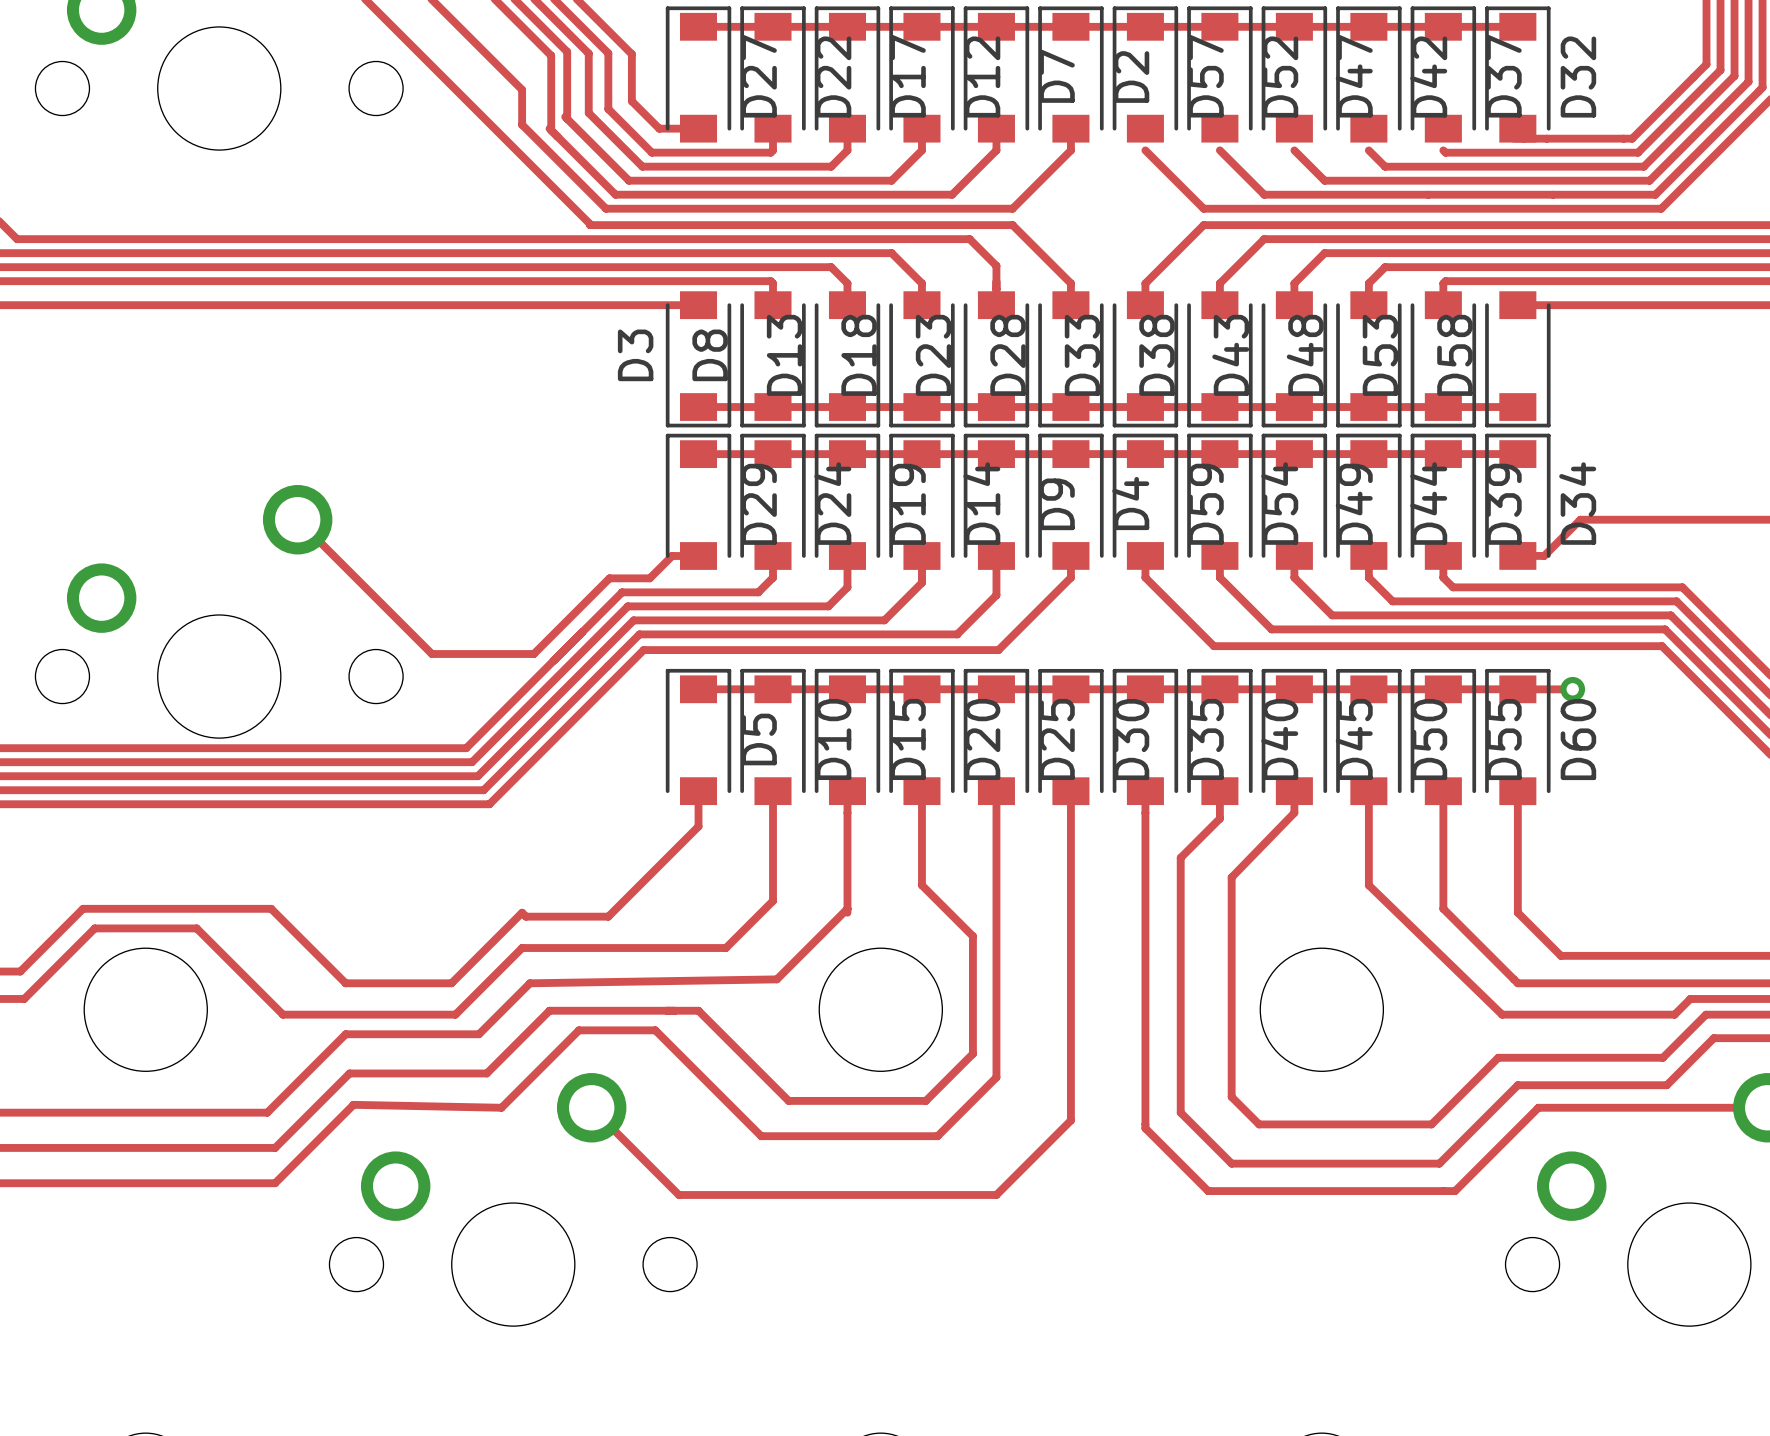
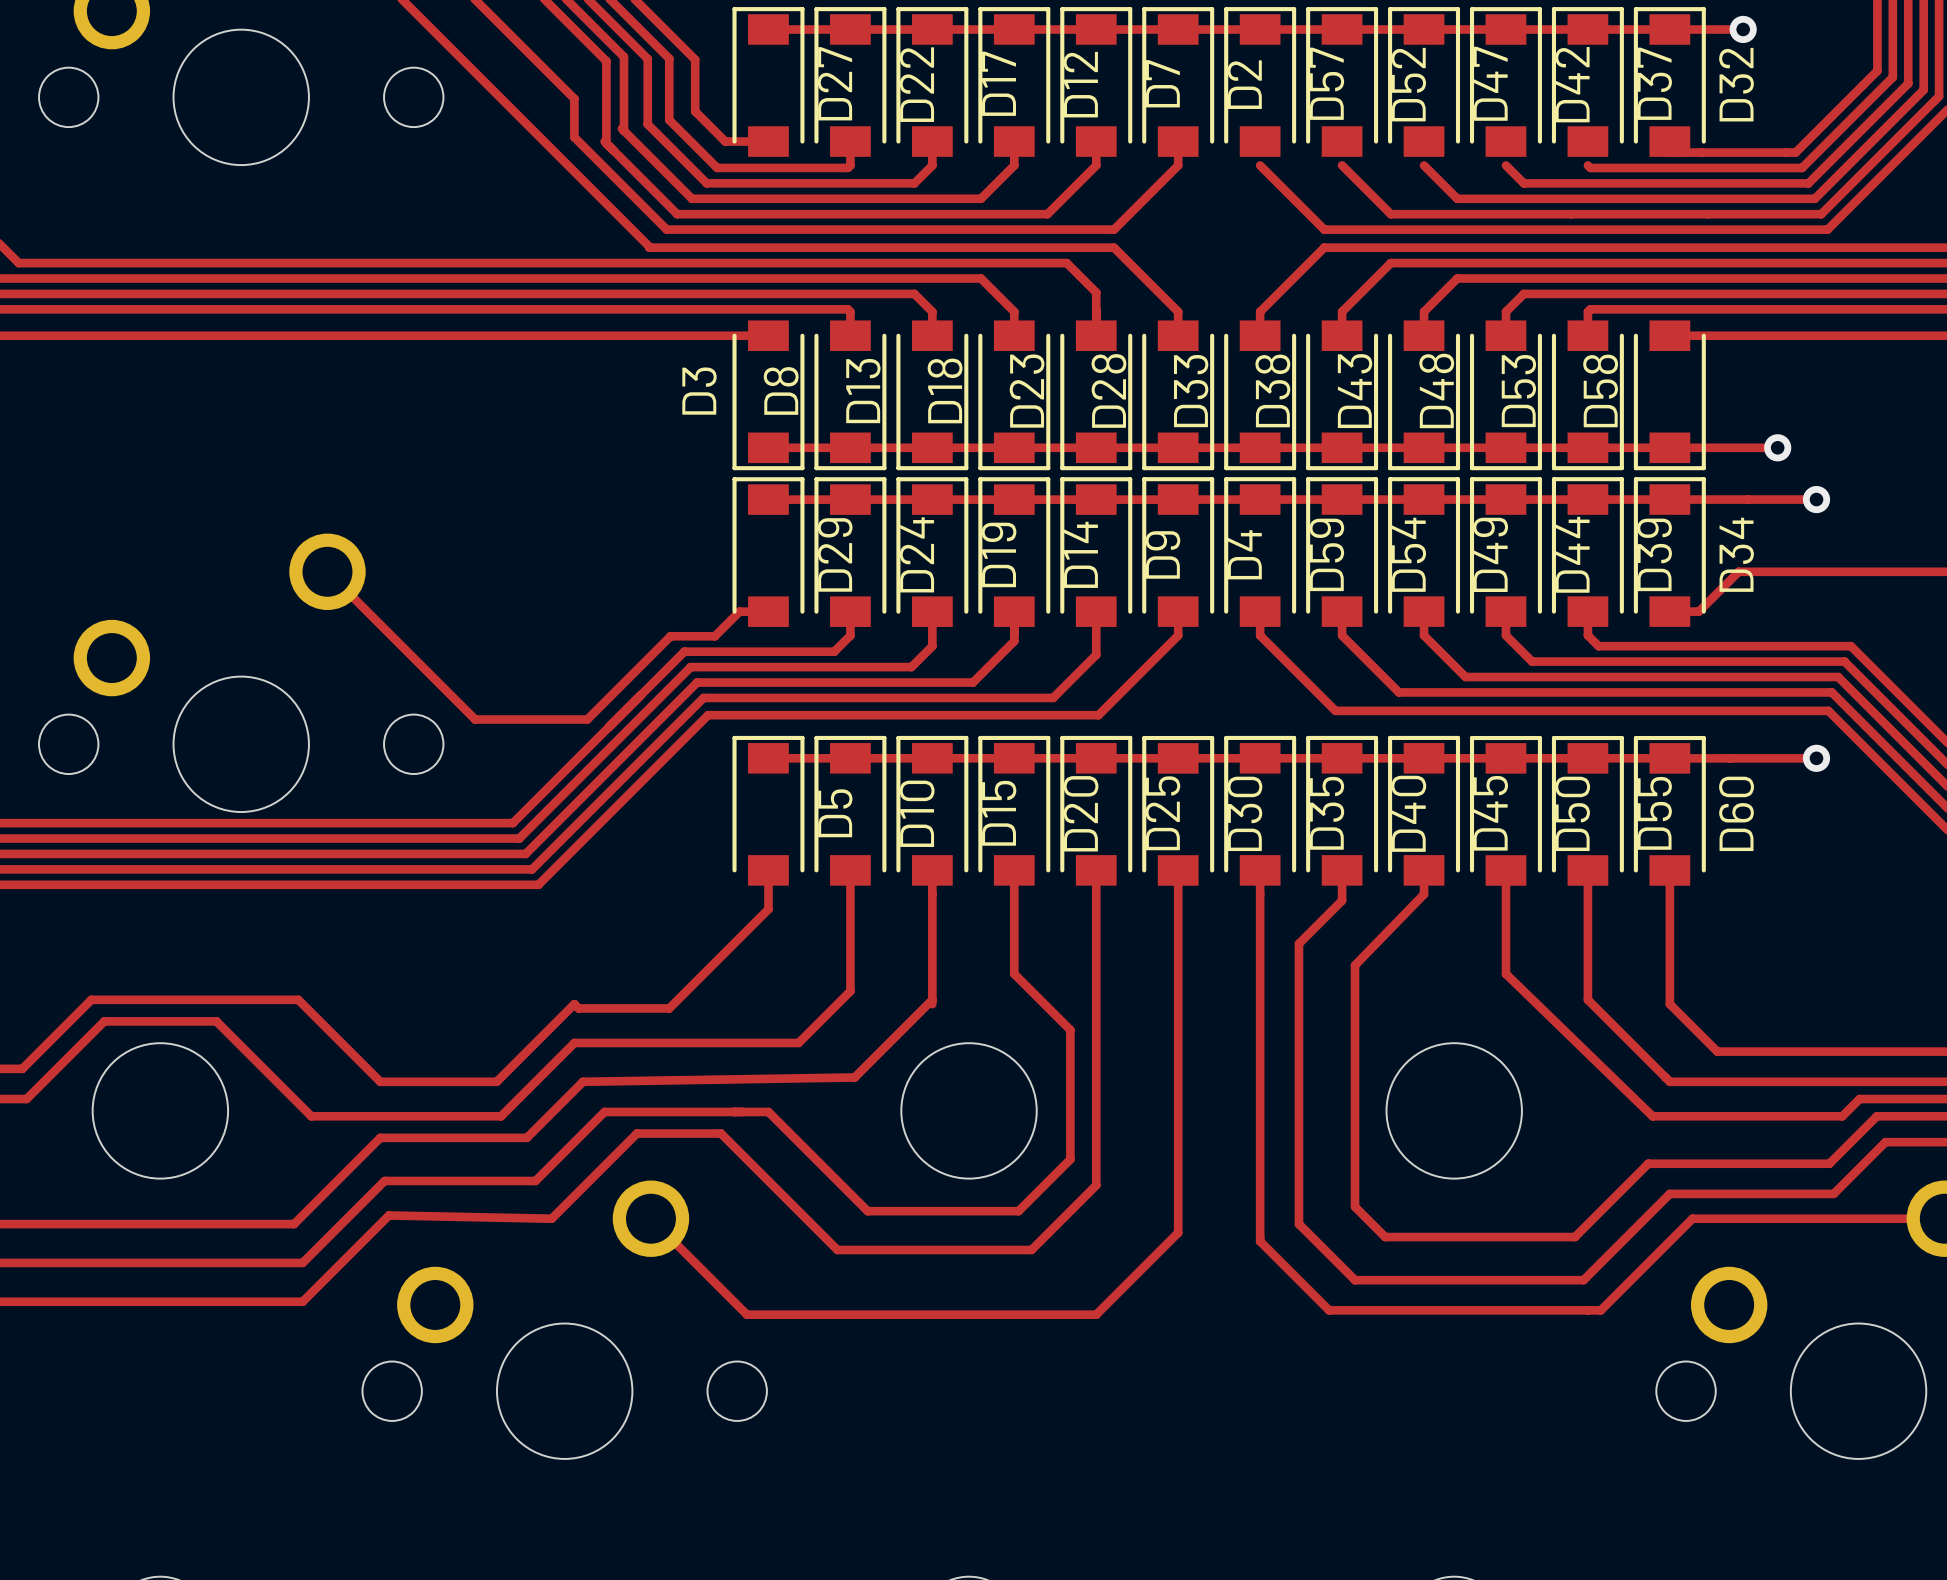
track: none -> (1669, 29) (1743, 29)
via: none -> (1743, 29)
track: none -> (1669, 447) (1777, 447)
via: none -> (1777, 447)
track: none -> (1669, 499) (1816, 499)
via: none -> (1816, 499)
track: none -> (1730, 758) (1816, 758)
via position: (1572, 689) -> (1816, 758)

